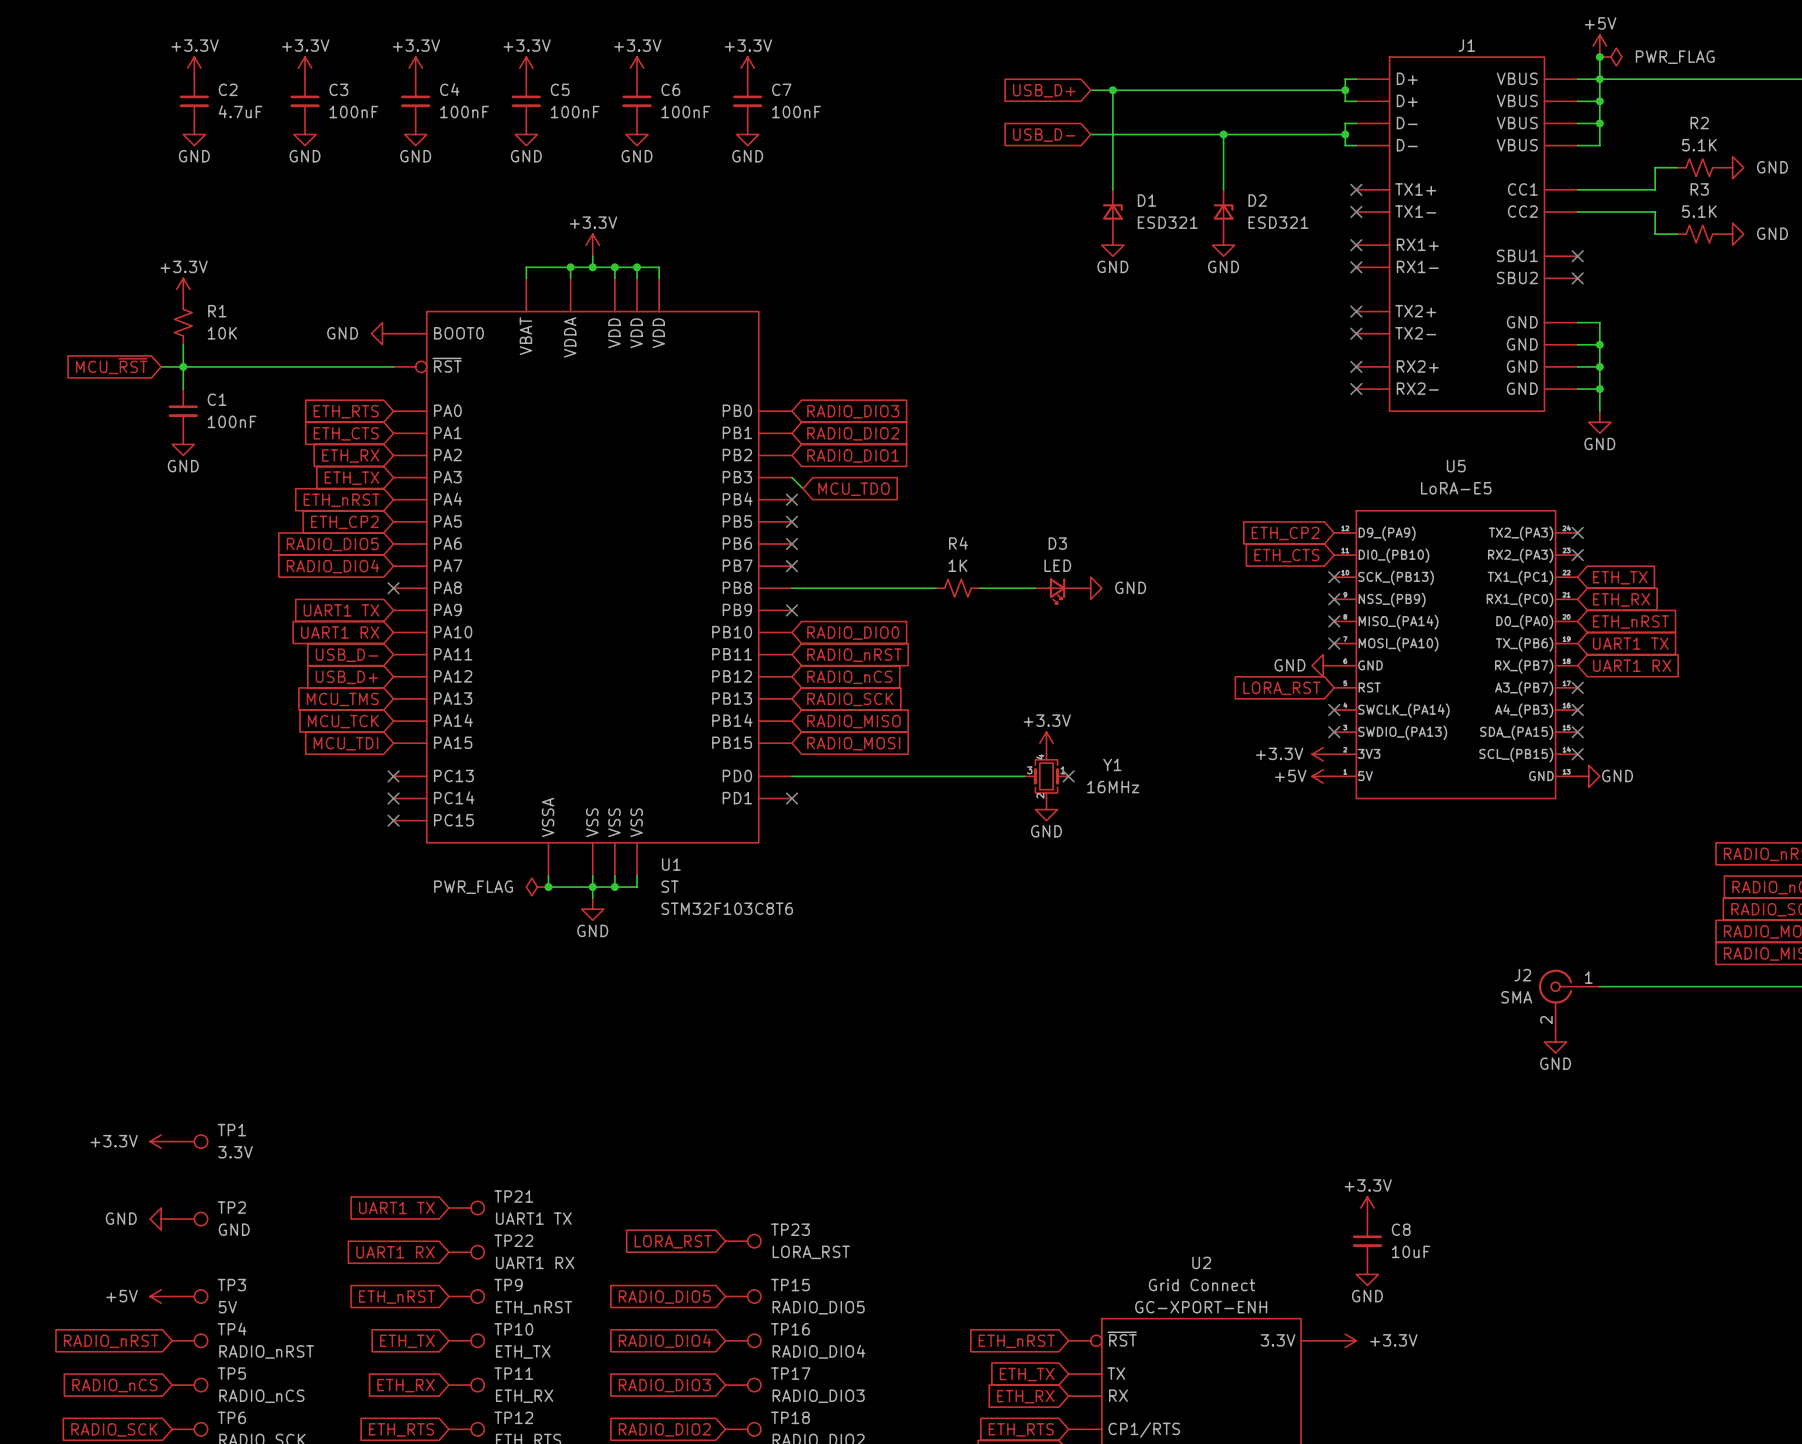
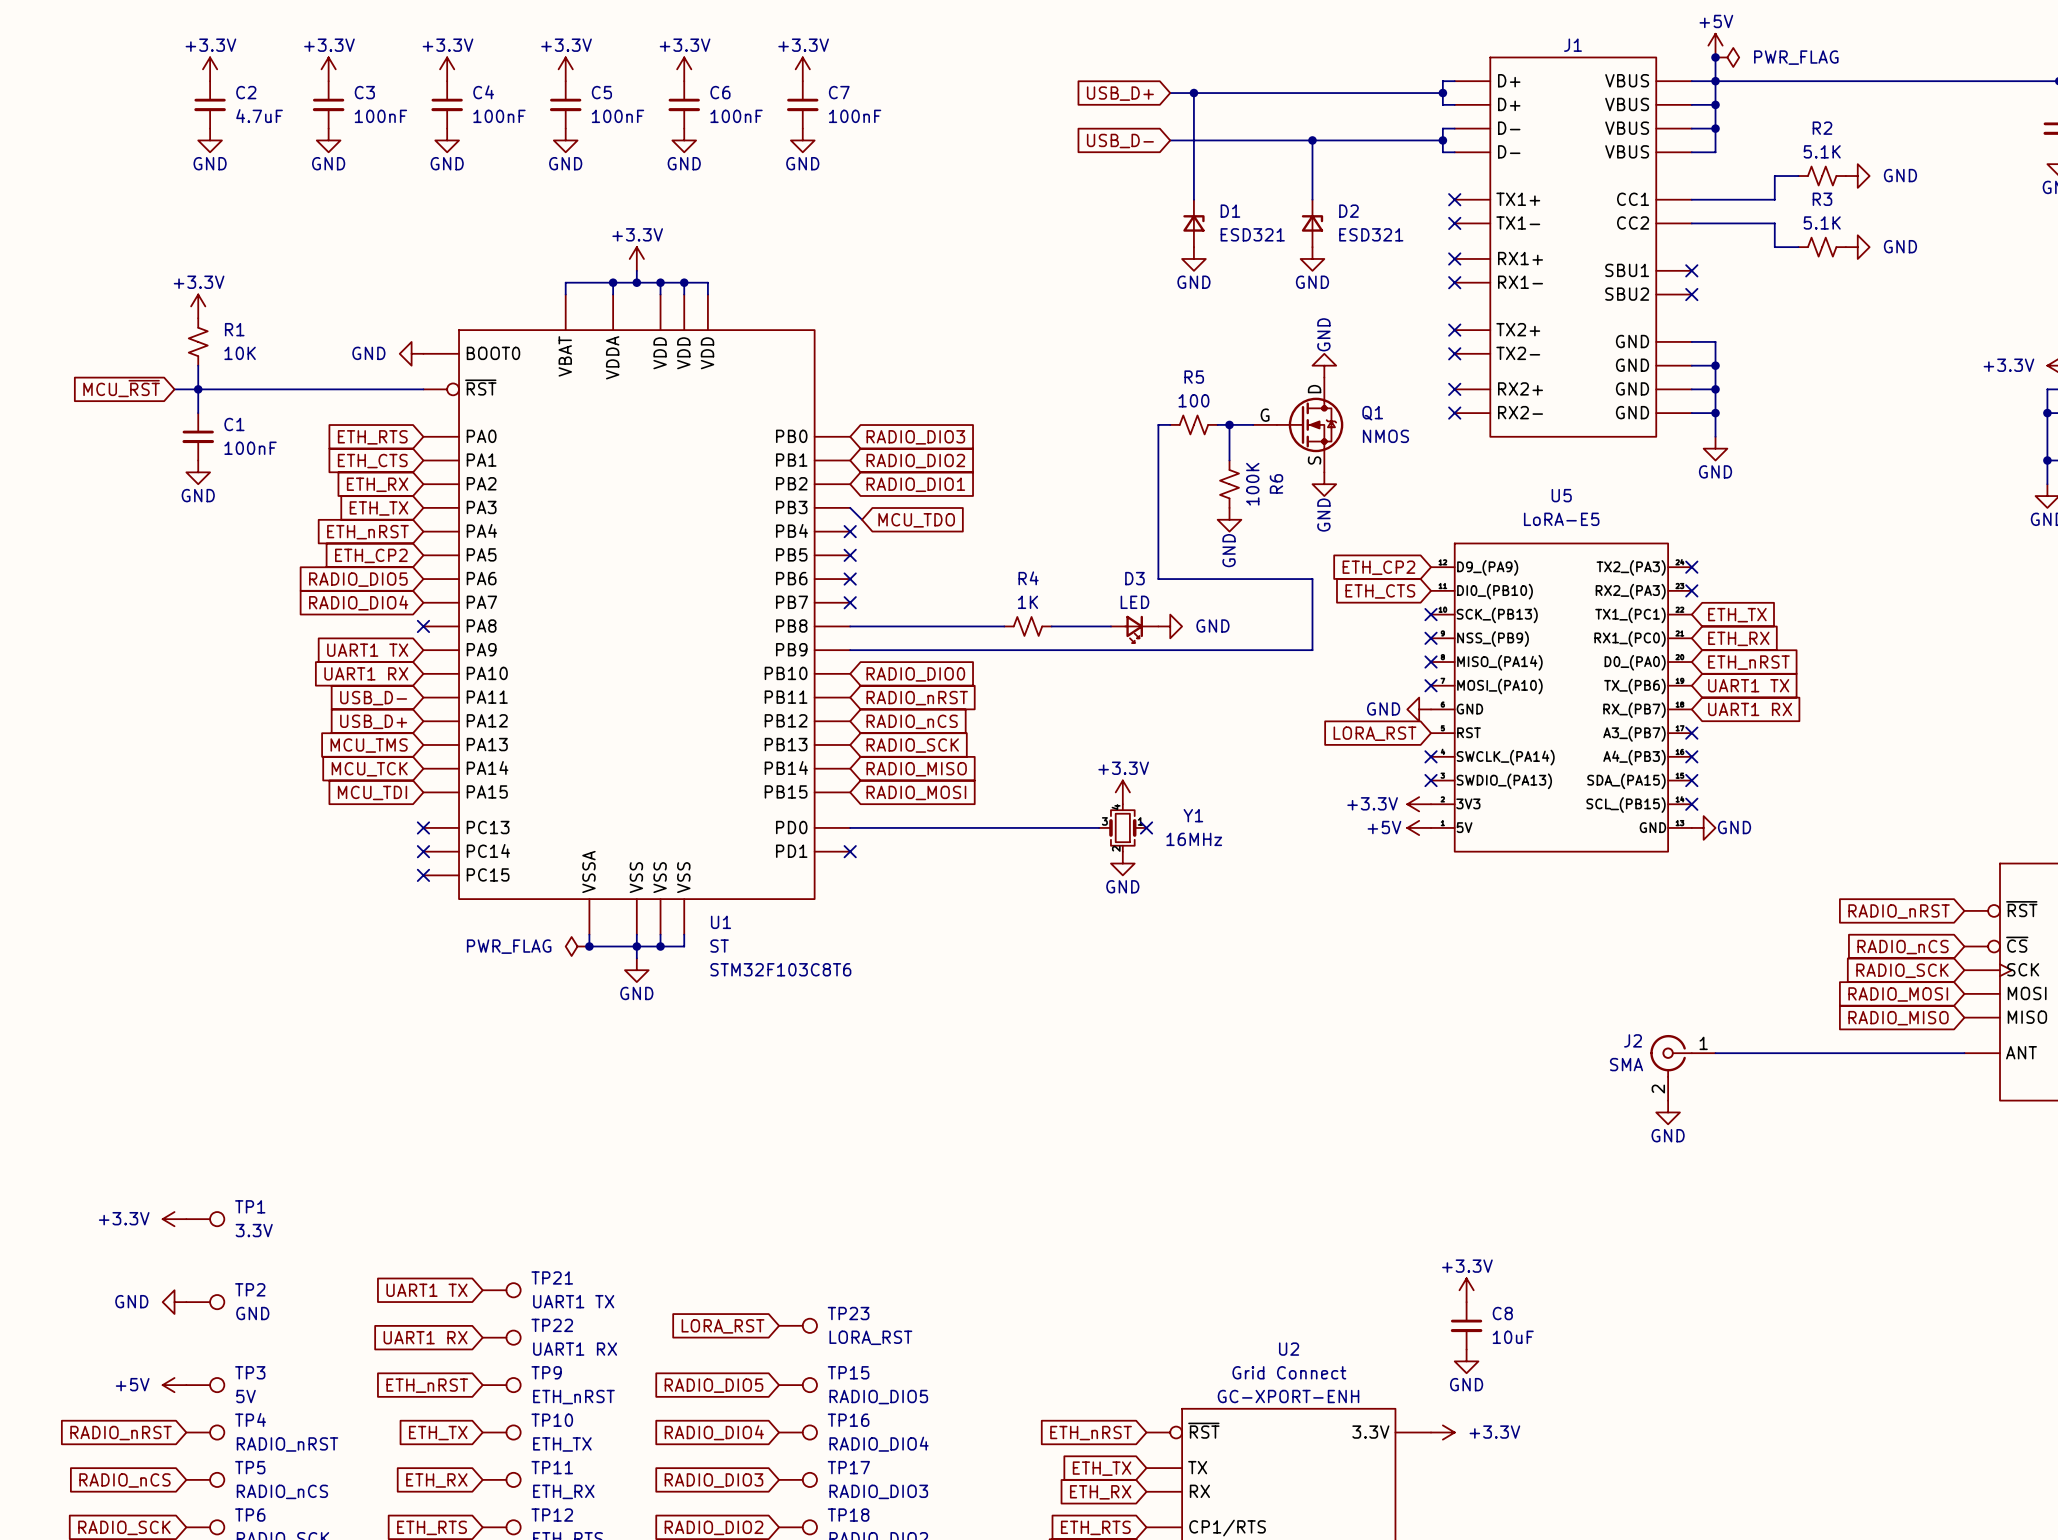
power symbol: none -> GND (1324, 365)
wire: none -> (1170, 424) (1158, 424) (1158, 579) (1312, 579) (1312, 650) (850, 650)
R5: none -> 100 (1193, 424)
wire: none -> (1217, 424) (1253, 424)
wire: none -> (1229, 424) (1229, 460)
junction: none -> (1229, 424)
Q1: none -> NMOS (1298, 424)
R6: none -> 100K (1229, 484)
power symbol: none -> GND (1324, 484)
power symbol: none -> GND (1229, 519)
no-connect mark: (791, 610) -> none

